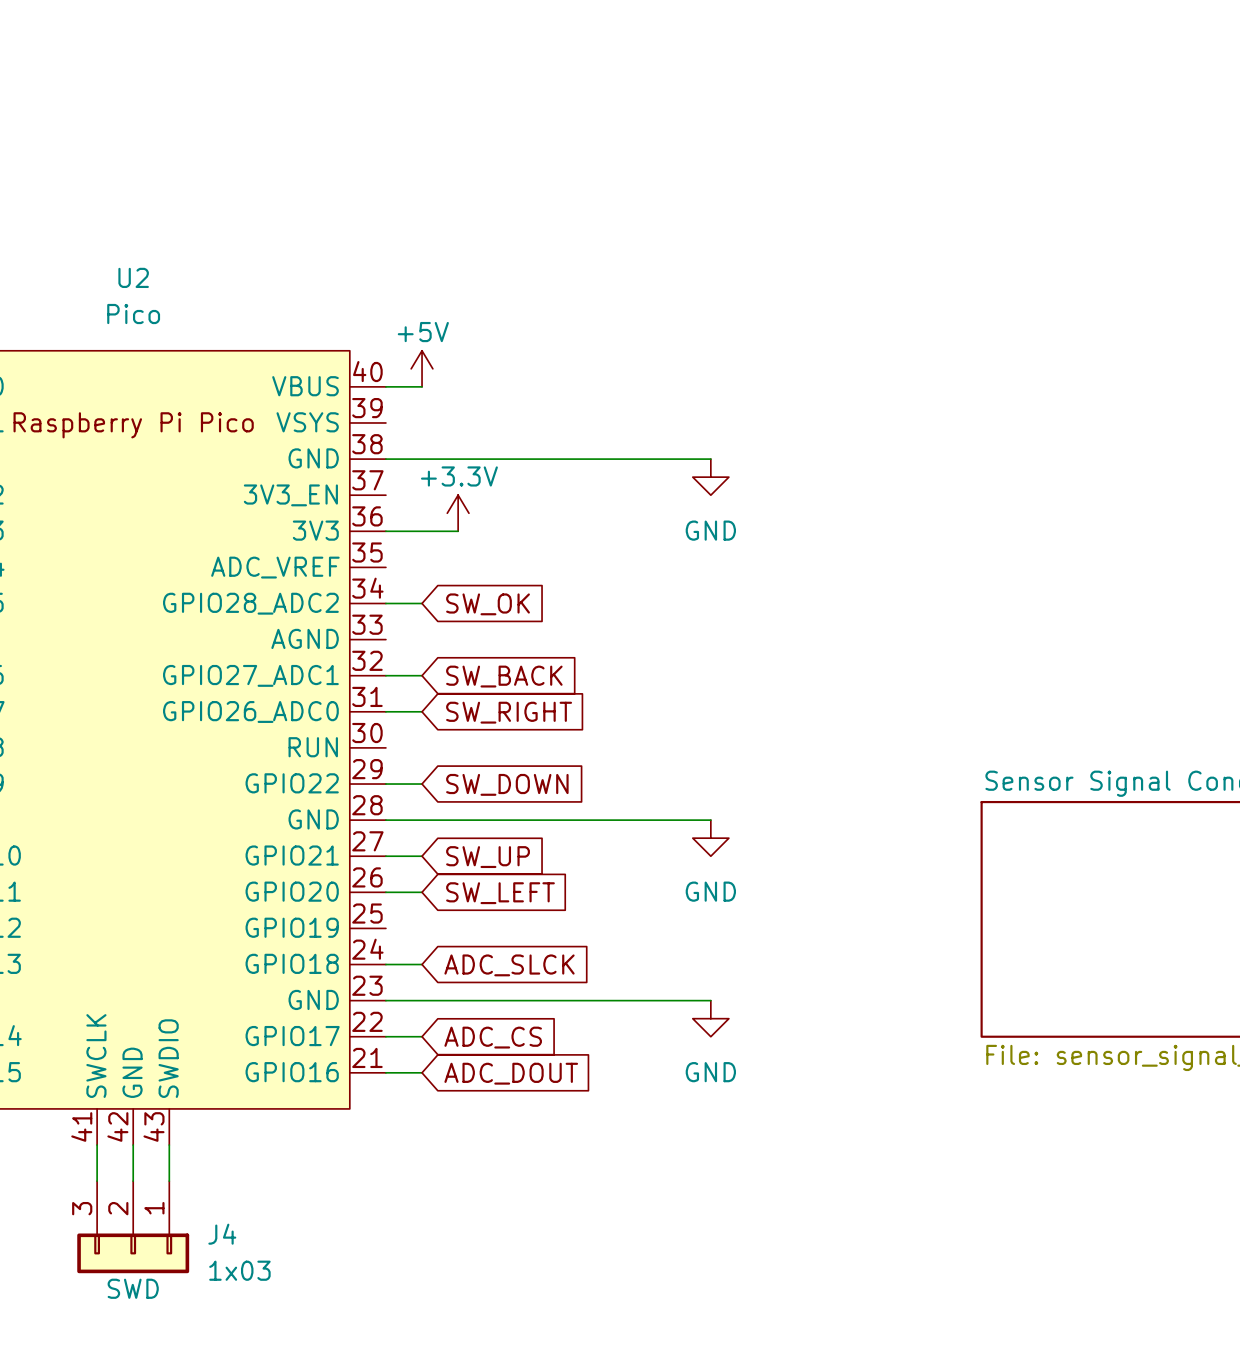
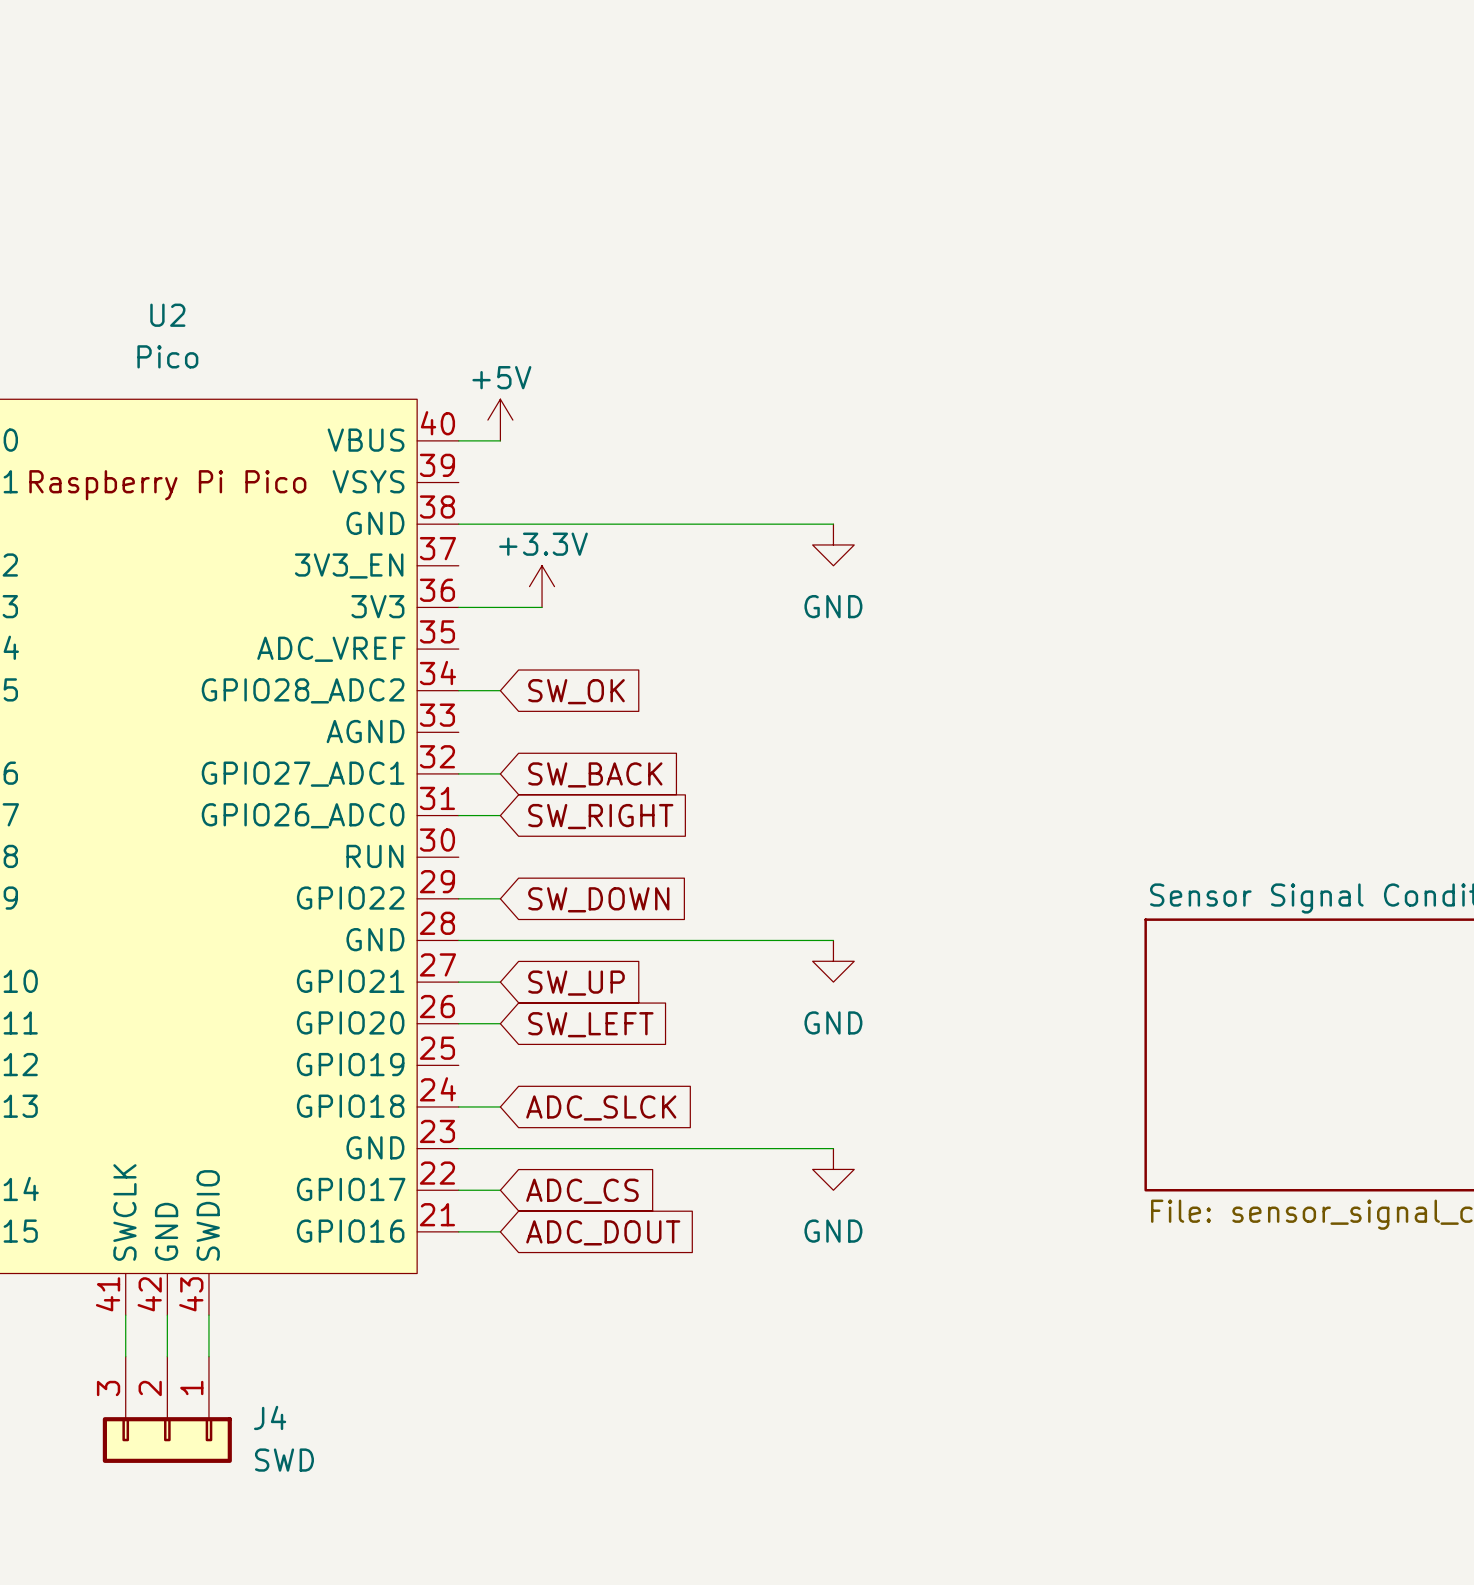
J4 value: 1x03 (239, 1270) -> SWD (284, 1460)
J4 text: SWD (133, 1288) -> none

